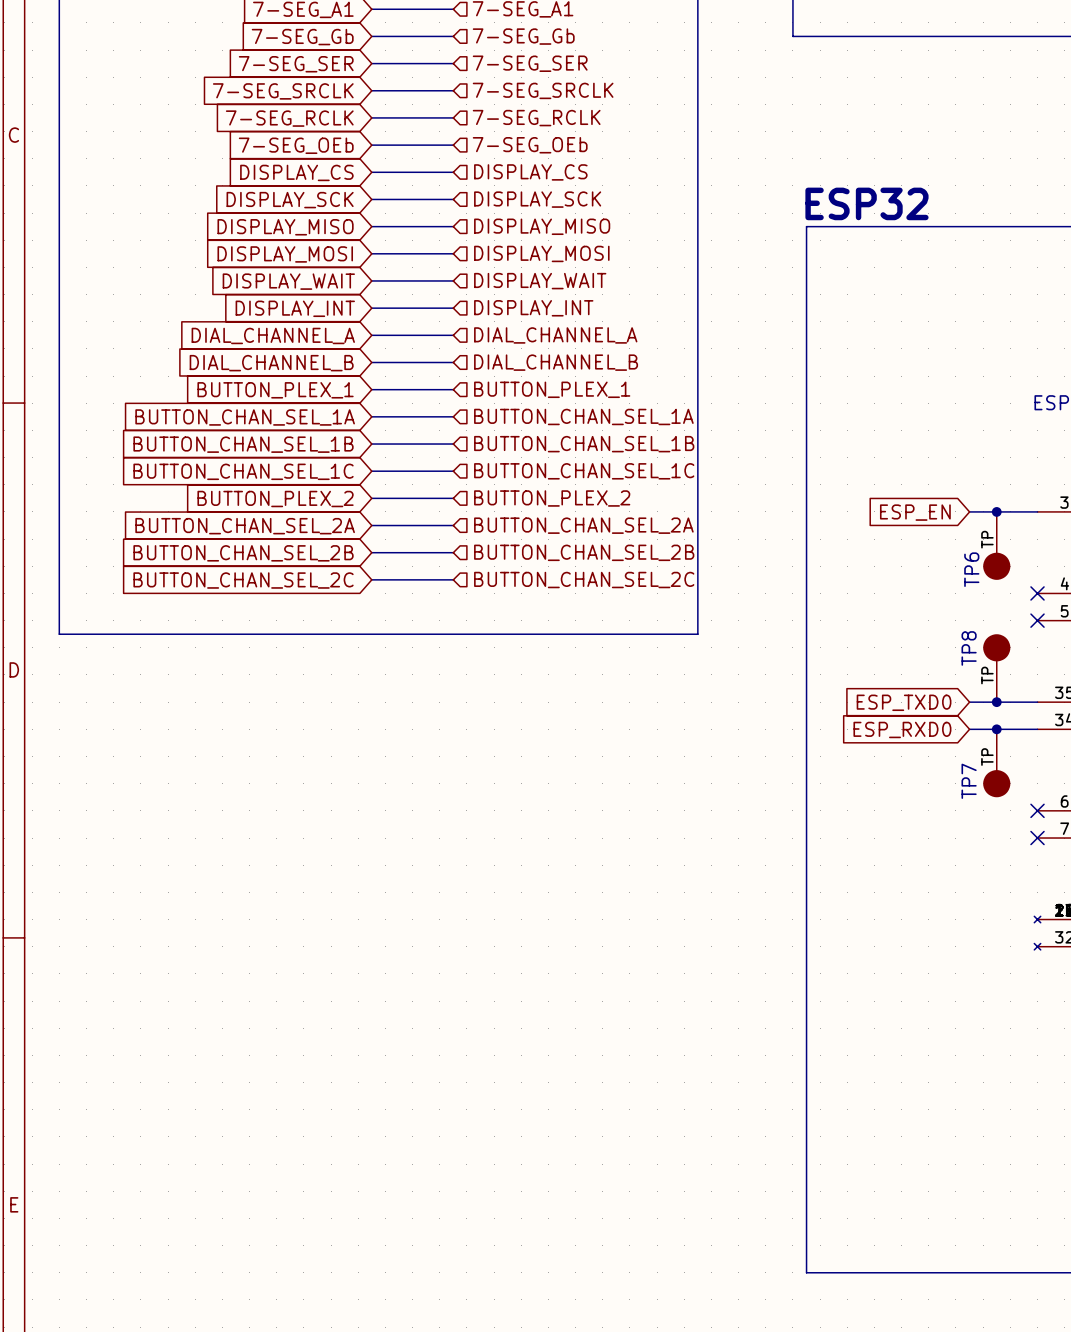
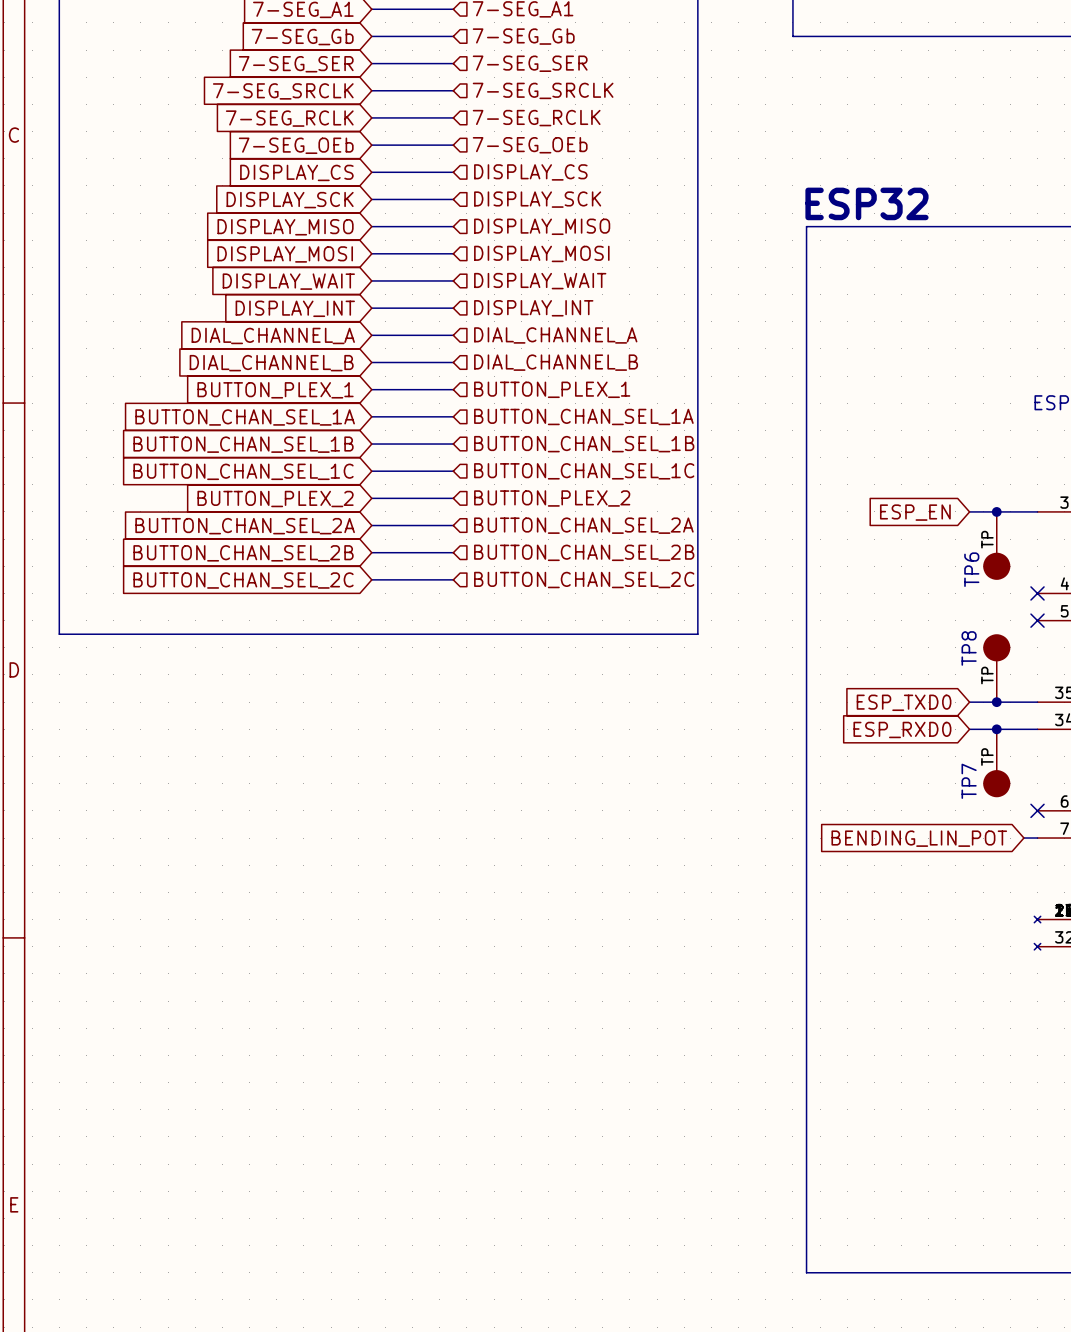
global label: none -> BENDING_LIN_POT (919, 838)
wire: none -> (1023, 838) (1037, 838)
no-connect mark: (1037, 838) -> none

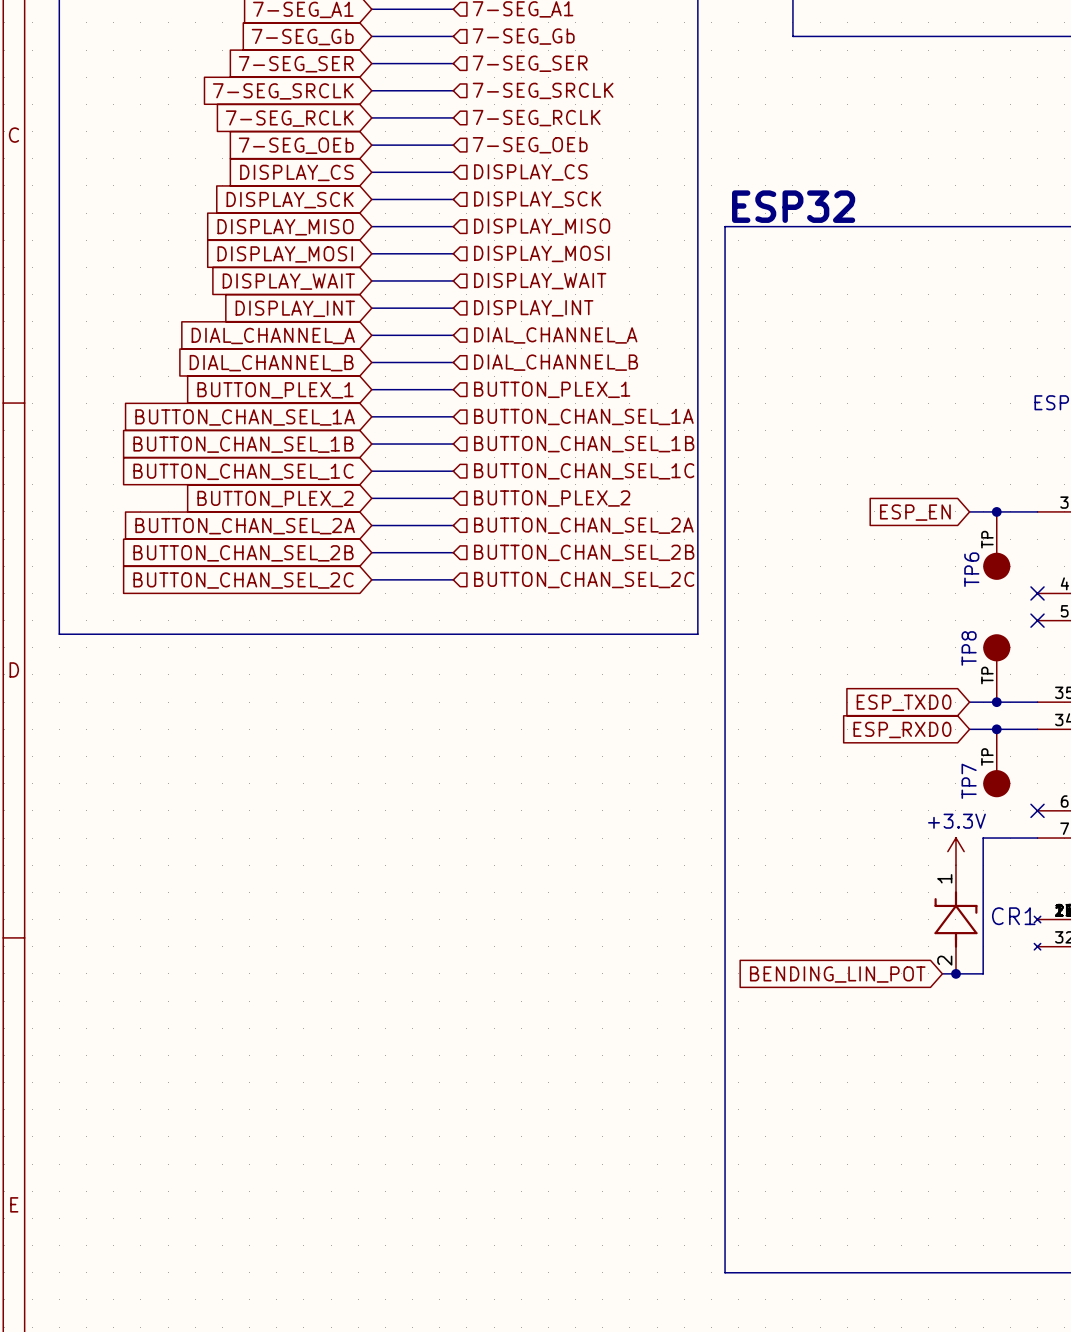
text position: ESP32 (866, 203) -> ESP32 (793, 206)
line: (806, 226) (806, 1272) -> (806, 226) (725, 226) (725, 1272) (806, 1272)
global label position: BENDING_LIN_POT (919, 838) -> BENDING_LIN_POT (837, 974)
wire: none -> (1023, 838) (983, 838) (983, 973) (942, 973)
power symbol: none -> +3.3V (955, 851)
CR1: none -> (955, 919)
junction: none -> (955, 973)

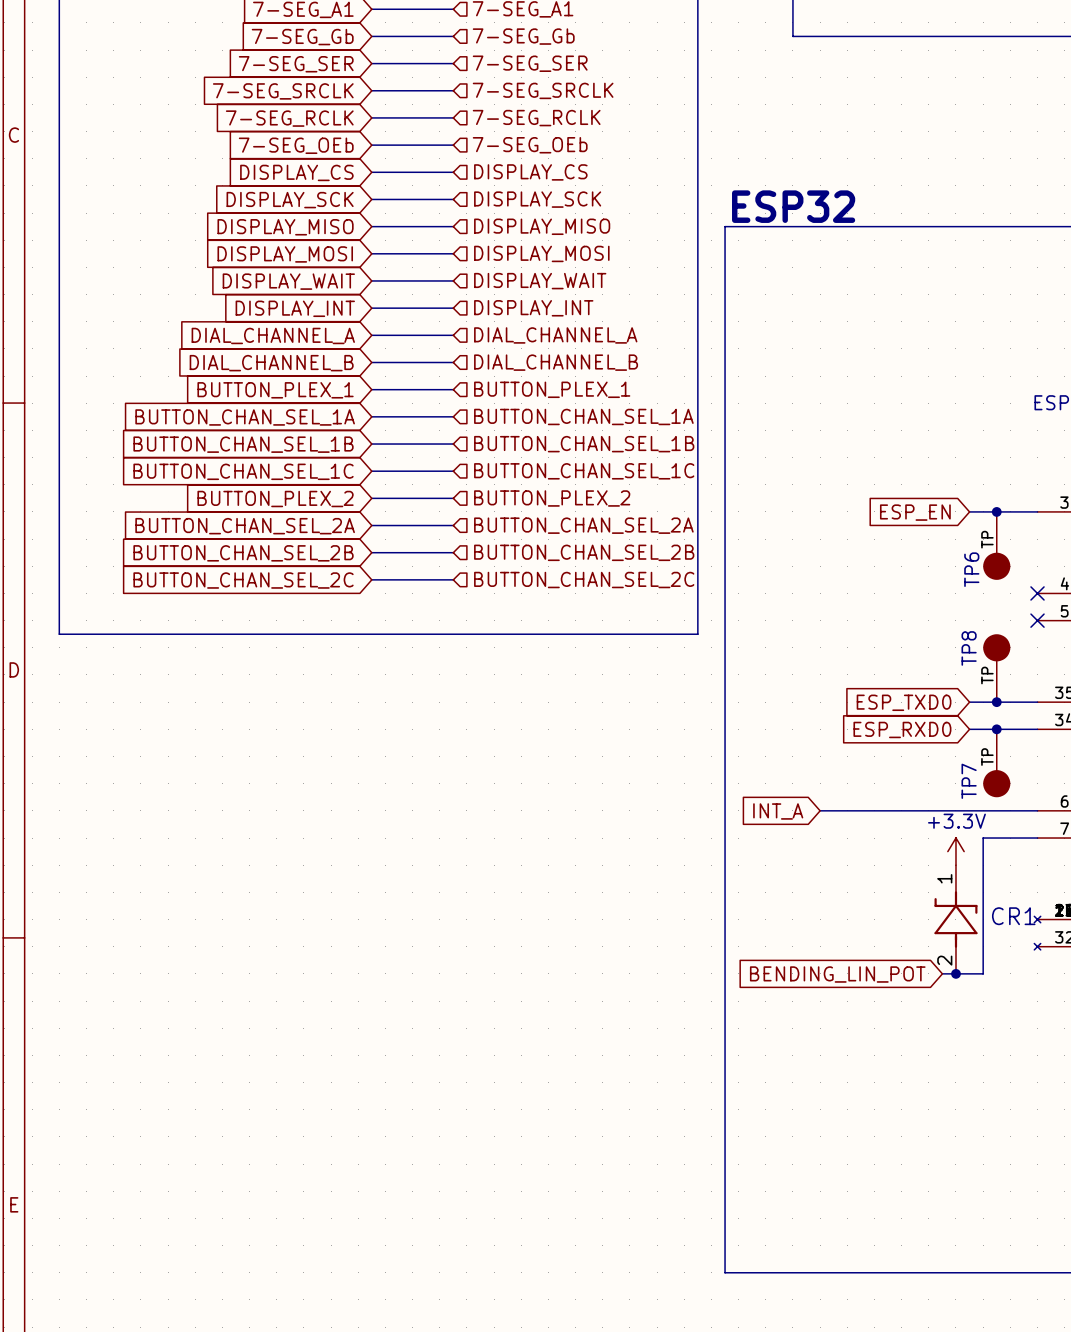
wire: none -> (820, 810) (1037, 810)
no-connect mark: (1037, 810) -> none
global label: none -> INT_A (778, 811)

